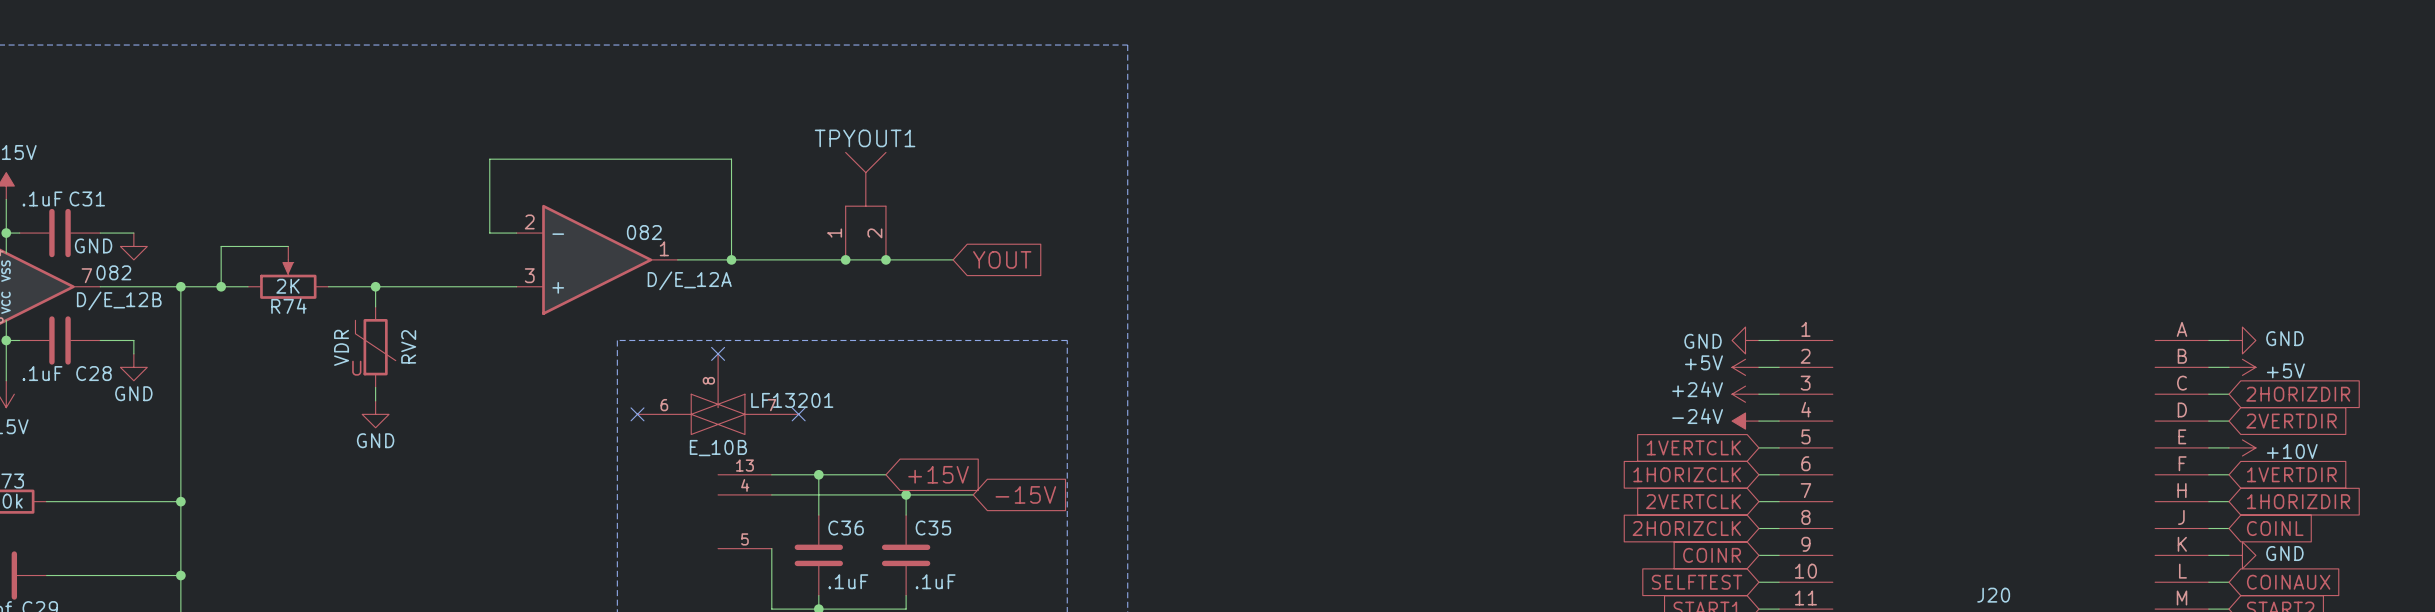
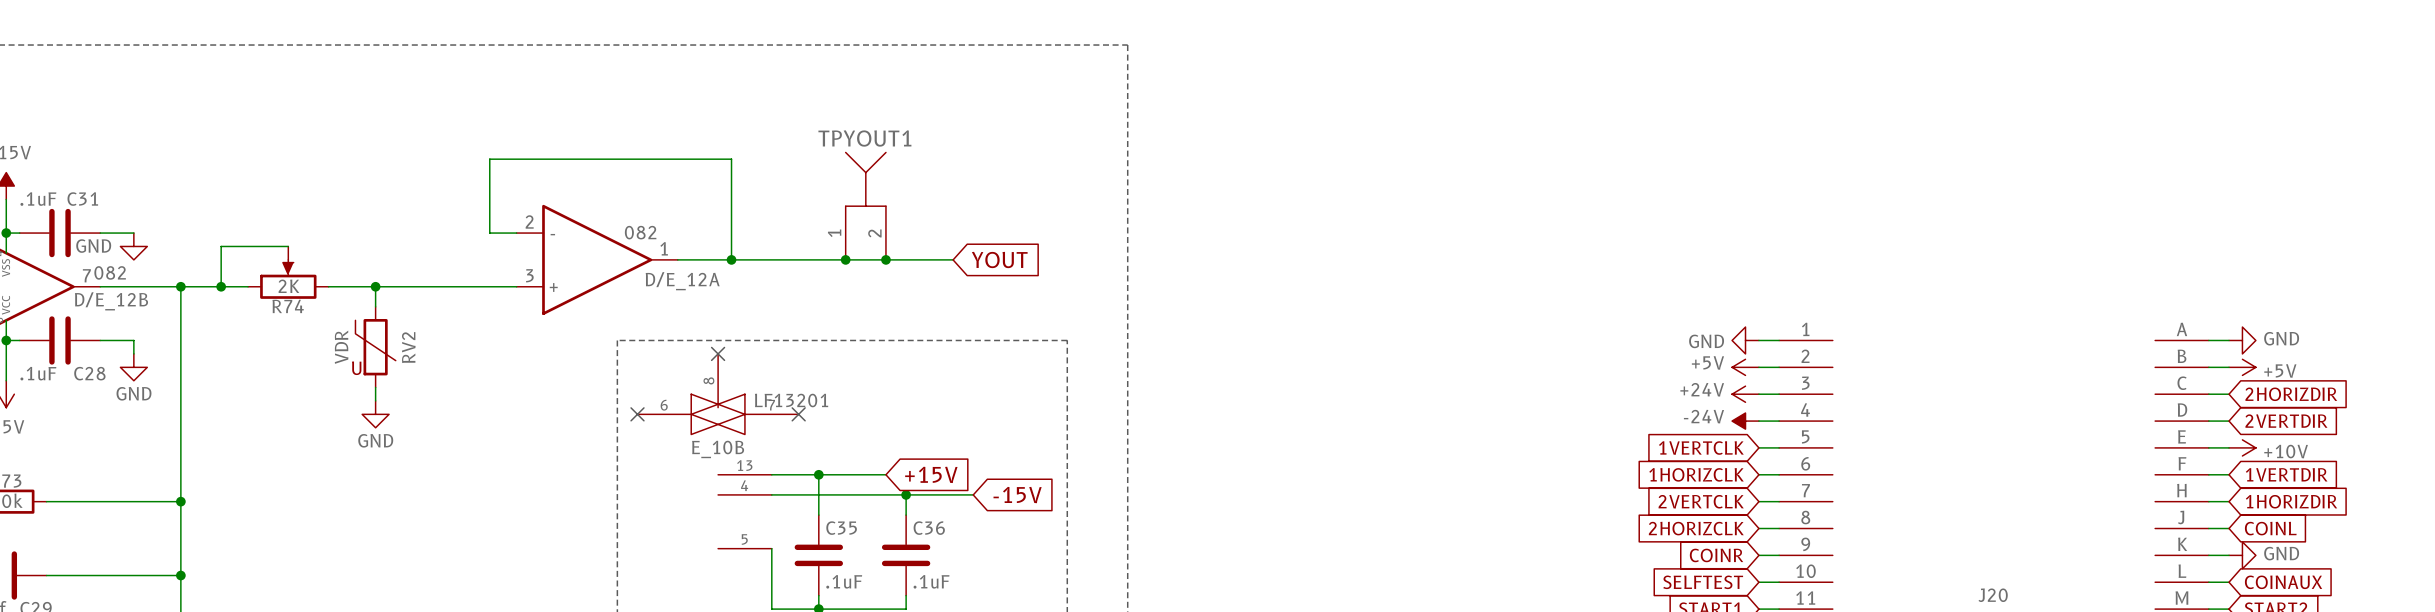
C36 name: C36 (846, 528) -> C35 (841, 528)
C35 name: C35 (933, 528) -> C36 (929, 528)

